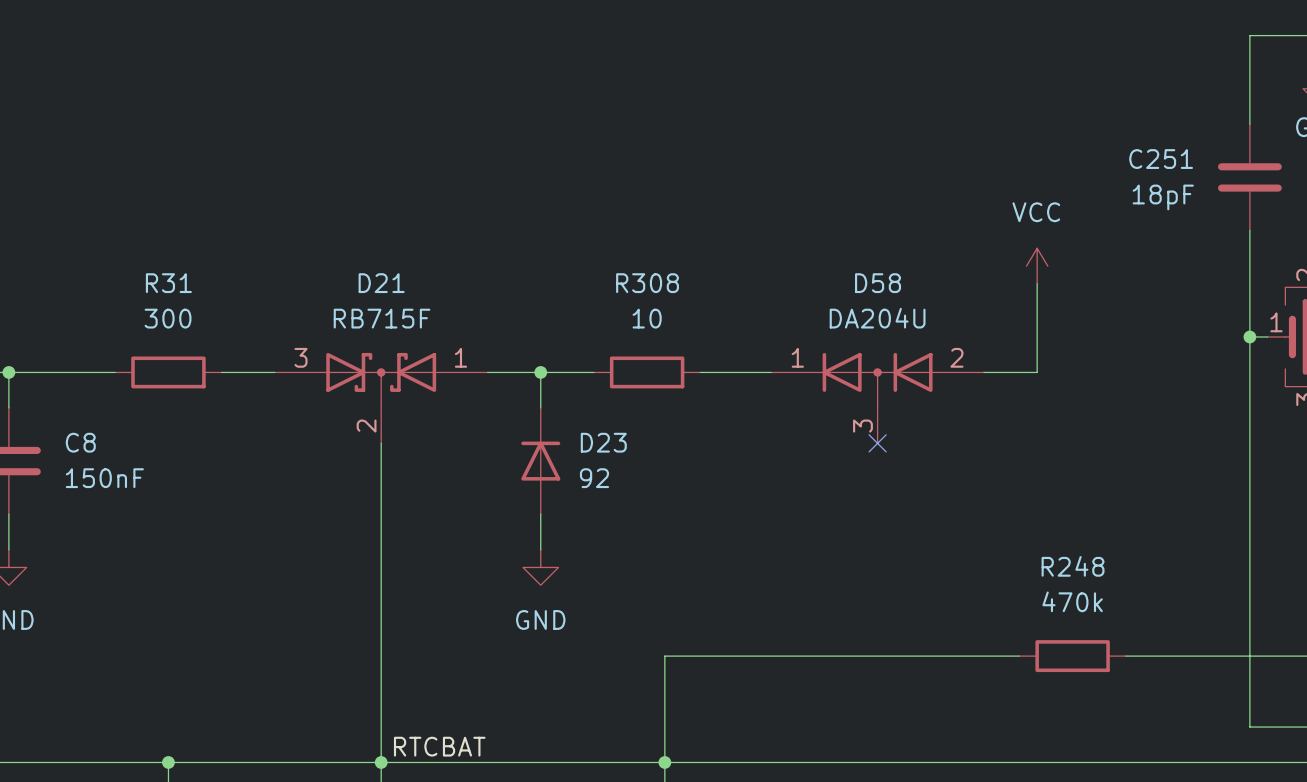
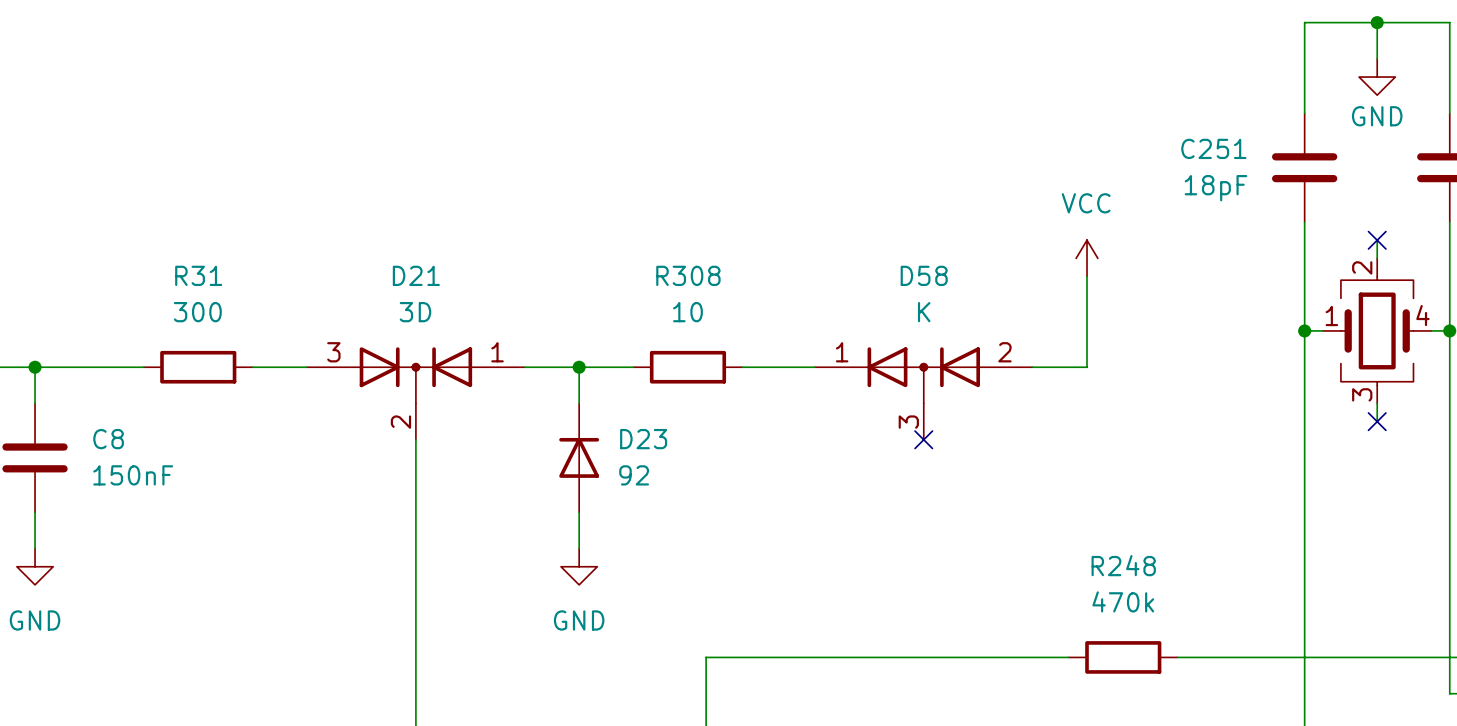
D21 value: RB715F (382, 318) -> 3D (415, 312)
D58 value: DA204U (877, 318) -> K (924, 312)
D21 symbol: [274, 352, 488, 444] -> [307, 347, 525, 440]

